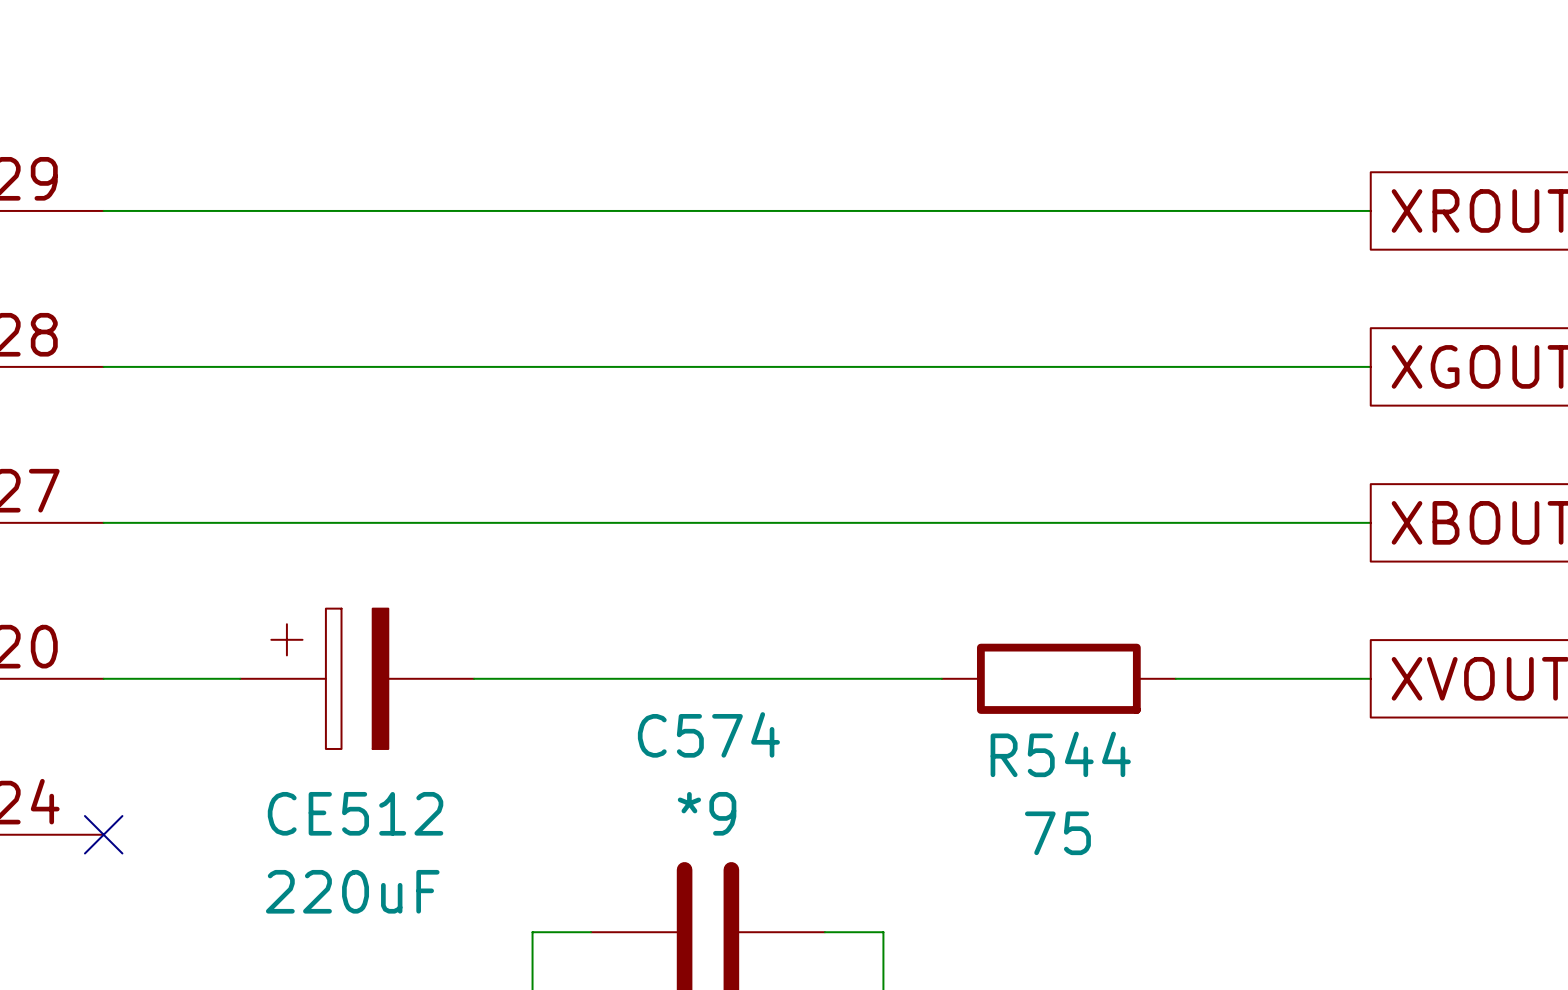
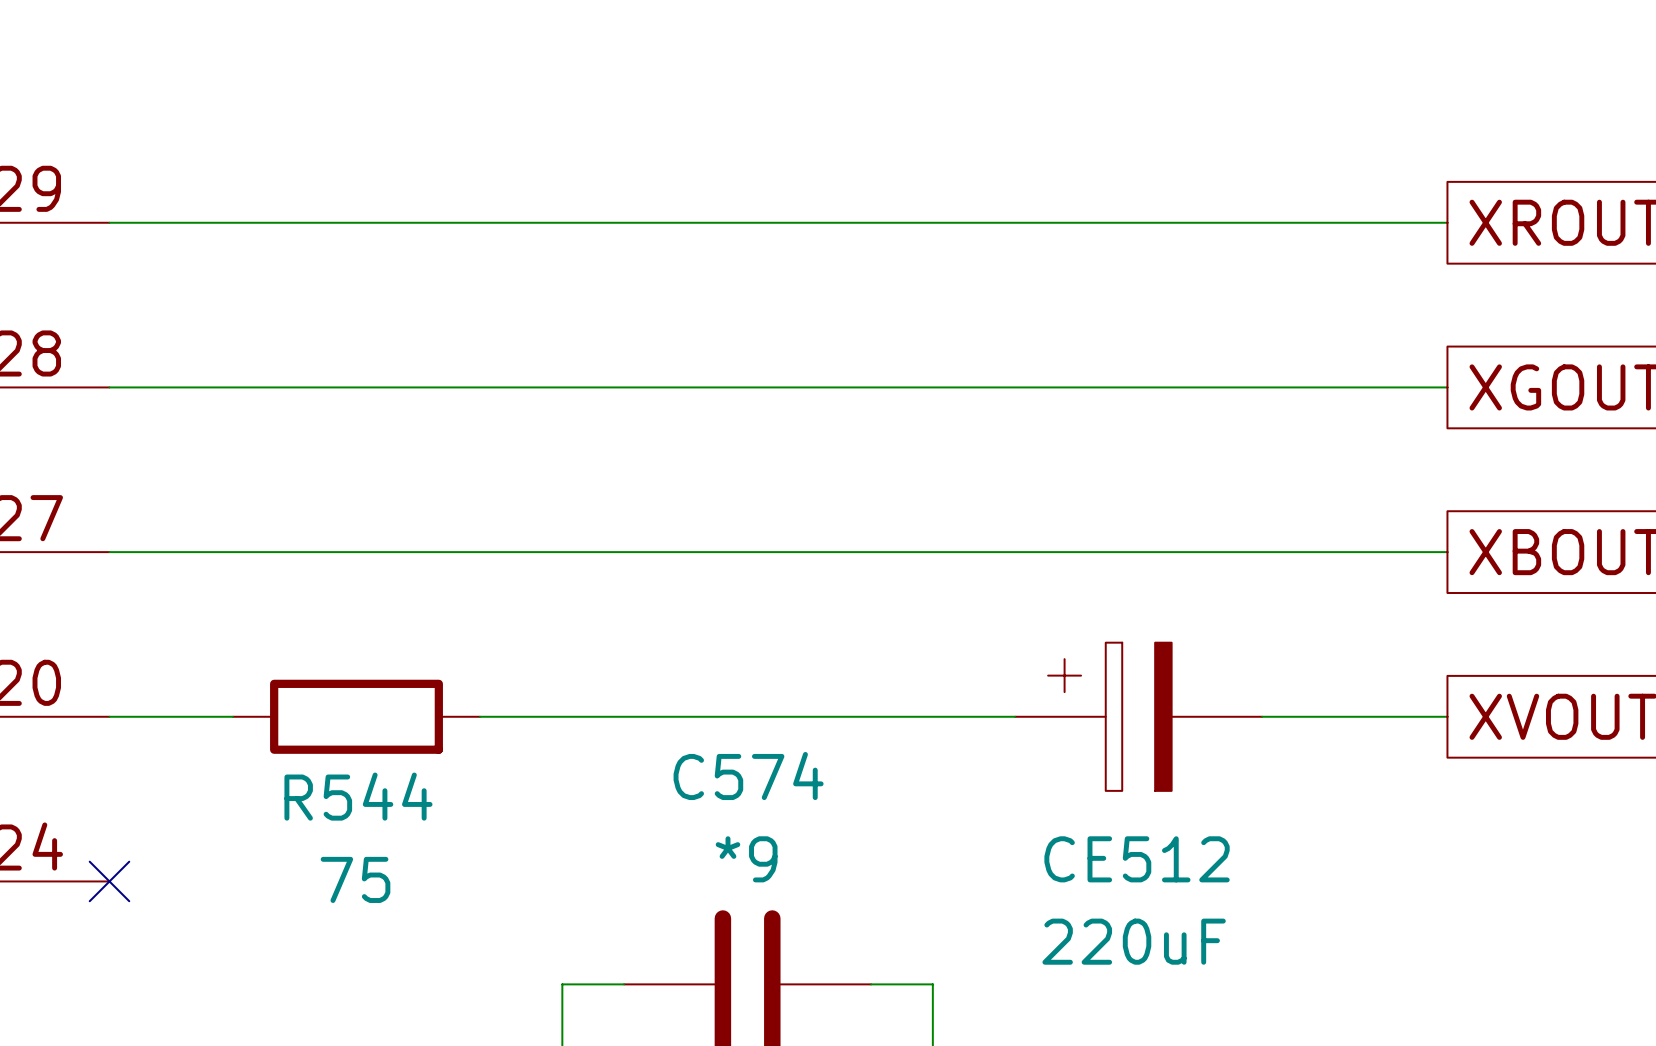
CE512 position: (357, 678) -> (1138, 716)
R544 position: (1058, 678) -> (356, 716)

